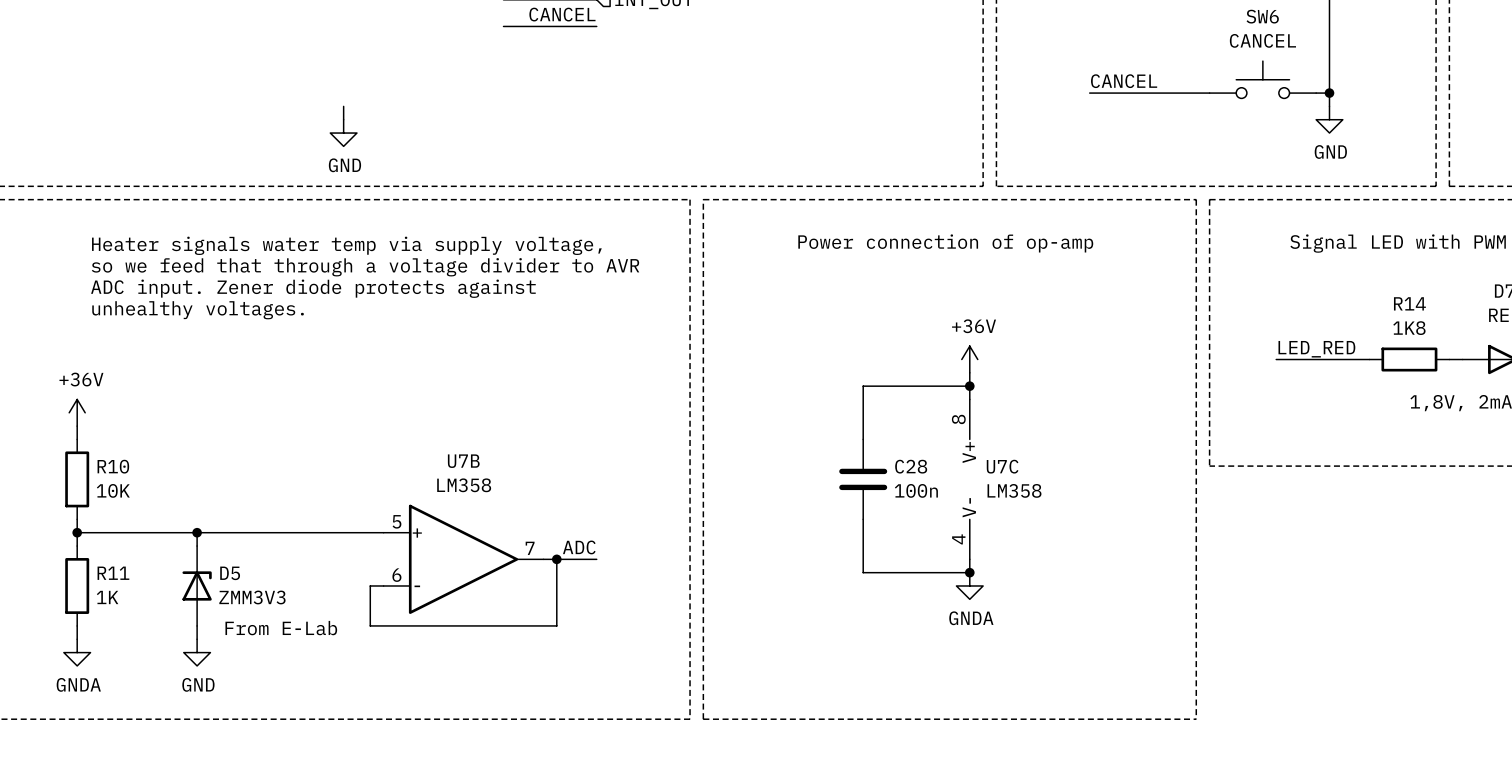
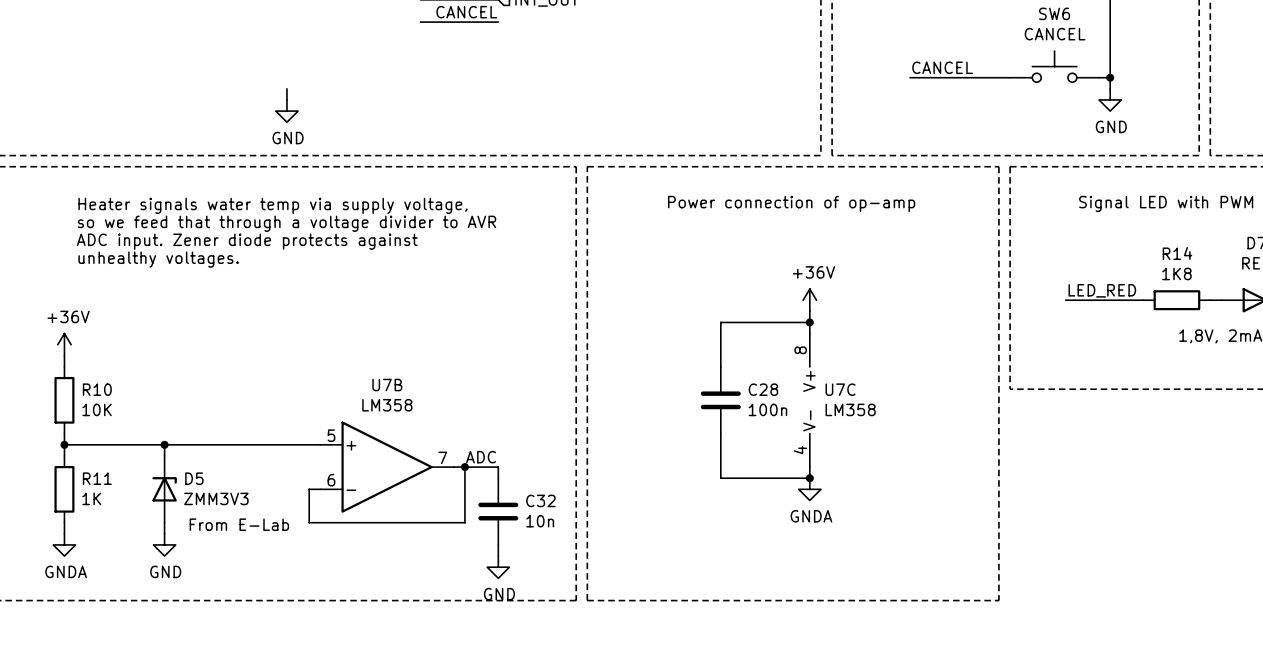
wire: none -> (498, 467) (498, 478)
C32: none -> 10n (498, 511)
wire: none -> (498, 544) (498, 556)
power symbol: none -> GND (498, 567)

